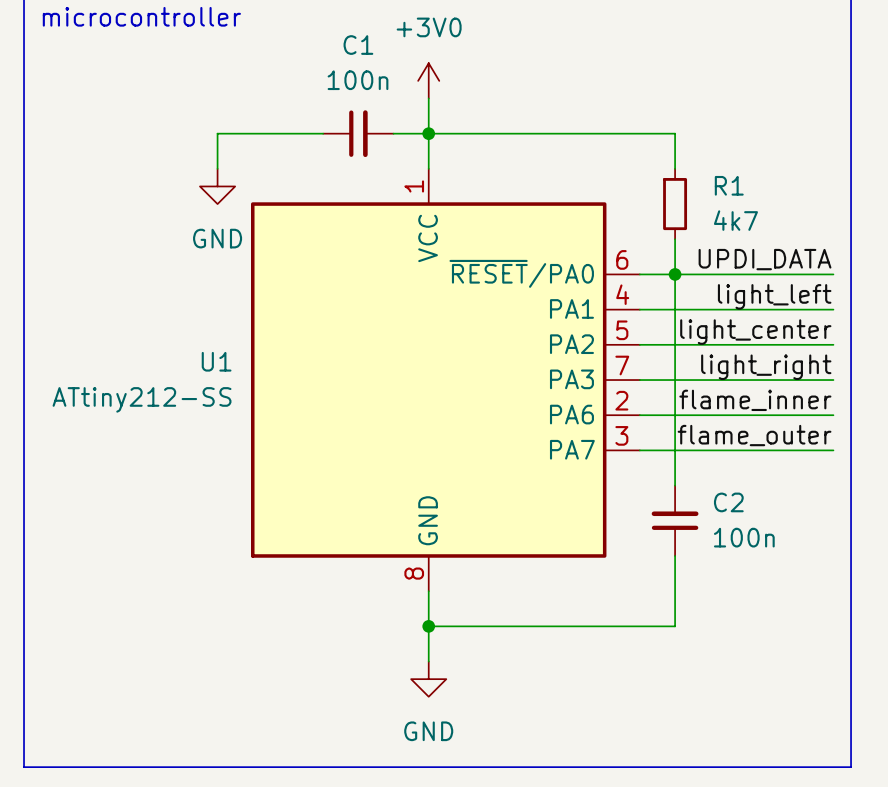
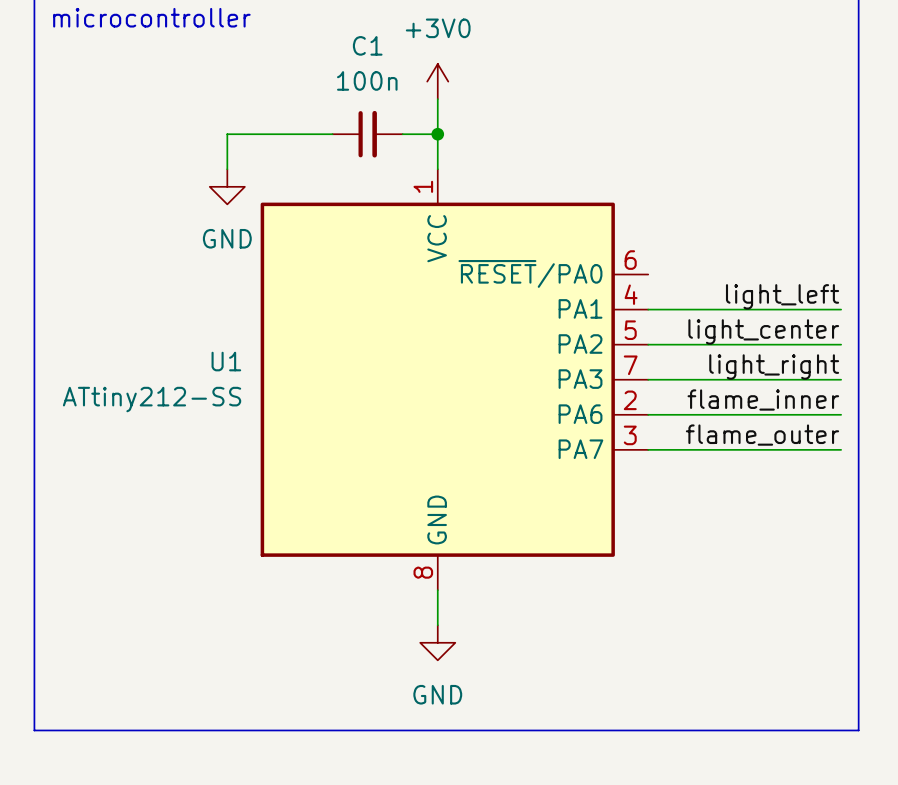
wire: (428, 133) (675, 133) (675, 168) -> none
R1: 4k7 (675, 204) -> none
wire: (675, 239) (675, 485) -> none
label: UPDI_DATA (765, 259) -> none
wire: (639, 274) (833, 274) -> none
junction: (675, 274) -> none
C2: 100n (675, 520) -> none
wire: (675, 555) (675, 626) (428, 626) (428, 661) -> none
junction: (428, 626) -> none
power symbol position: GND (428, 679) -> GND (437, 642)
line: (24, 731) (24, 767) (851, 767) (851, 731) -> (34, 730) (858, 730)

